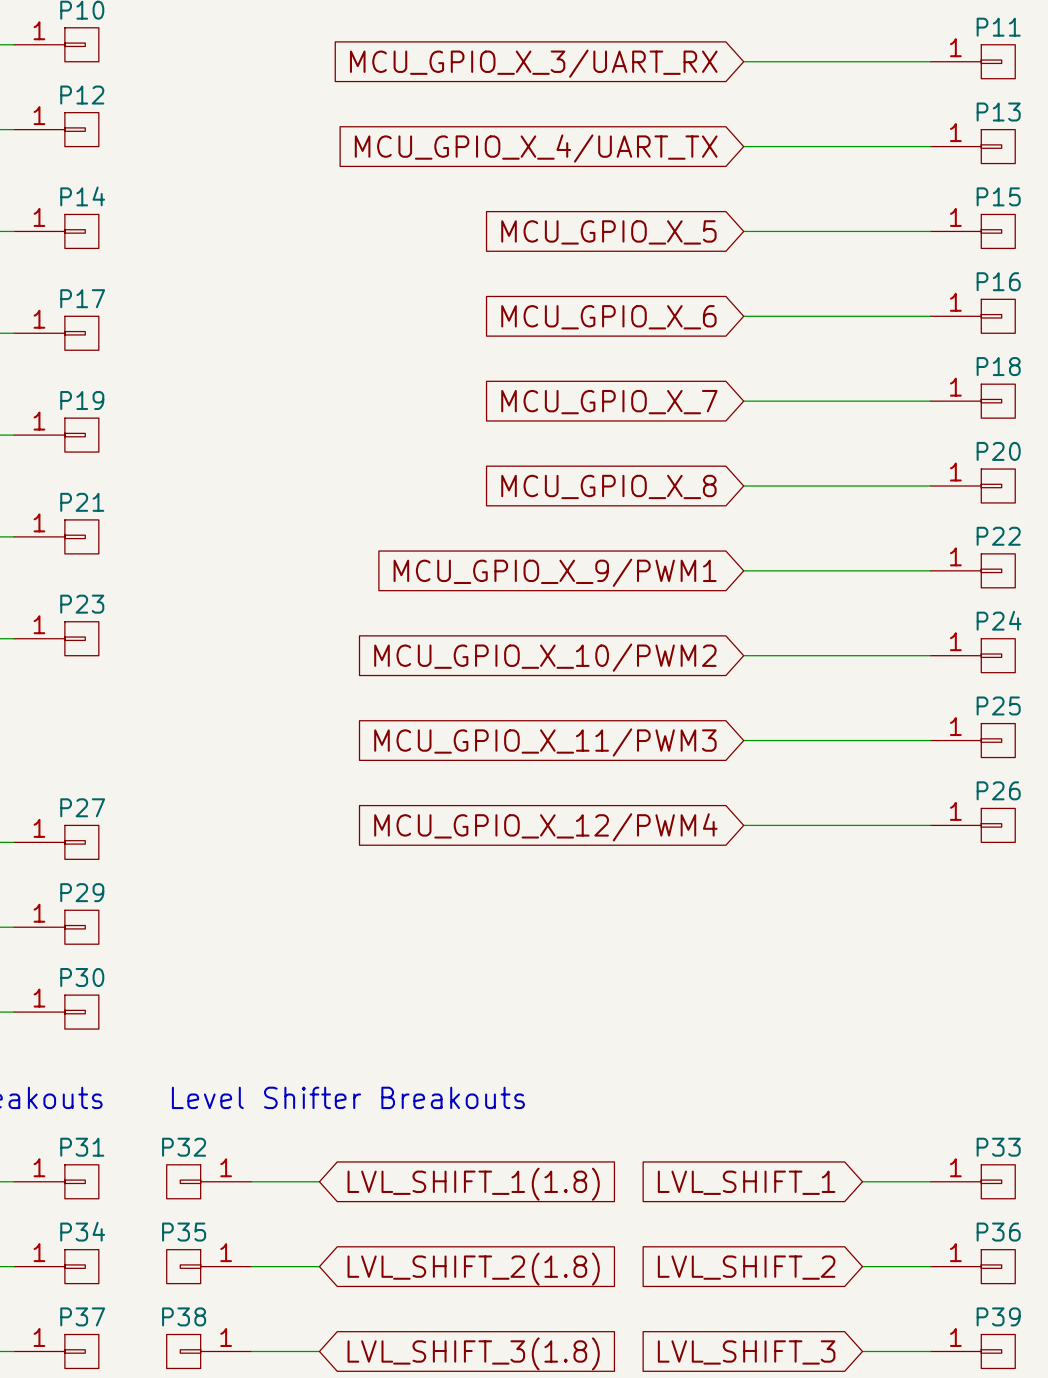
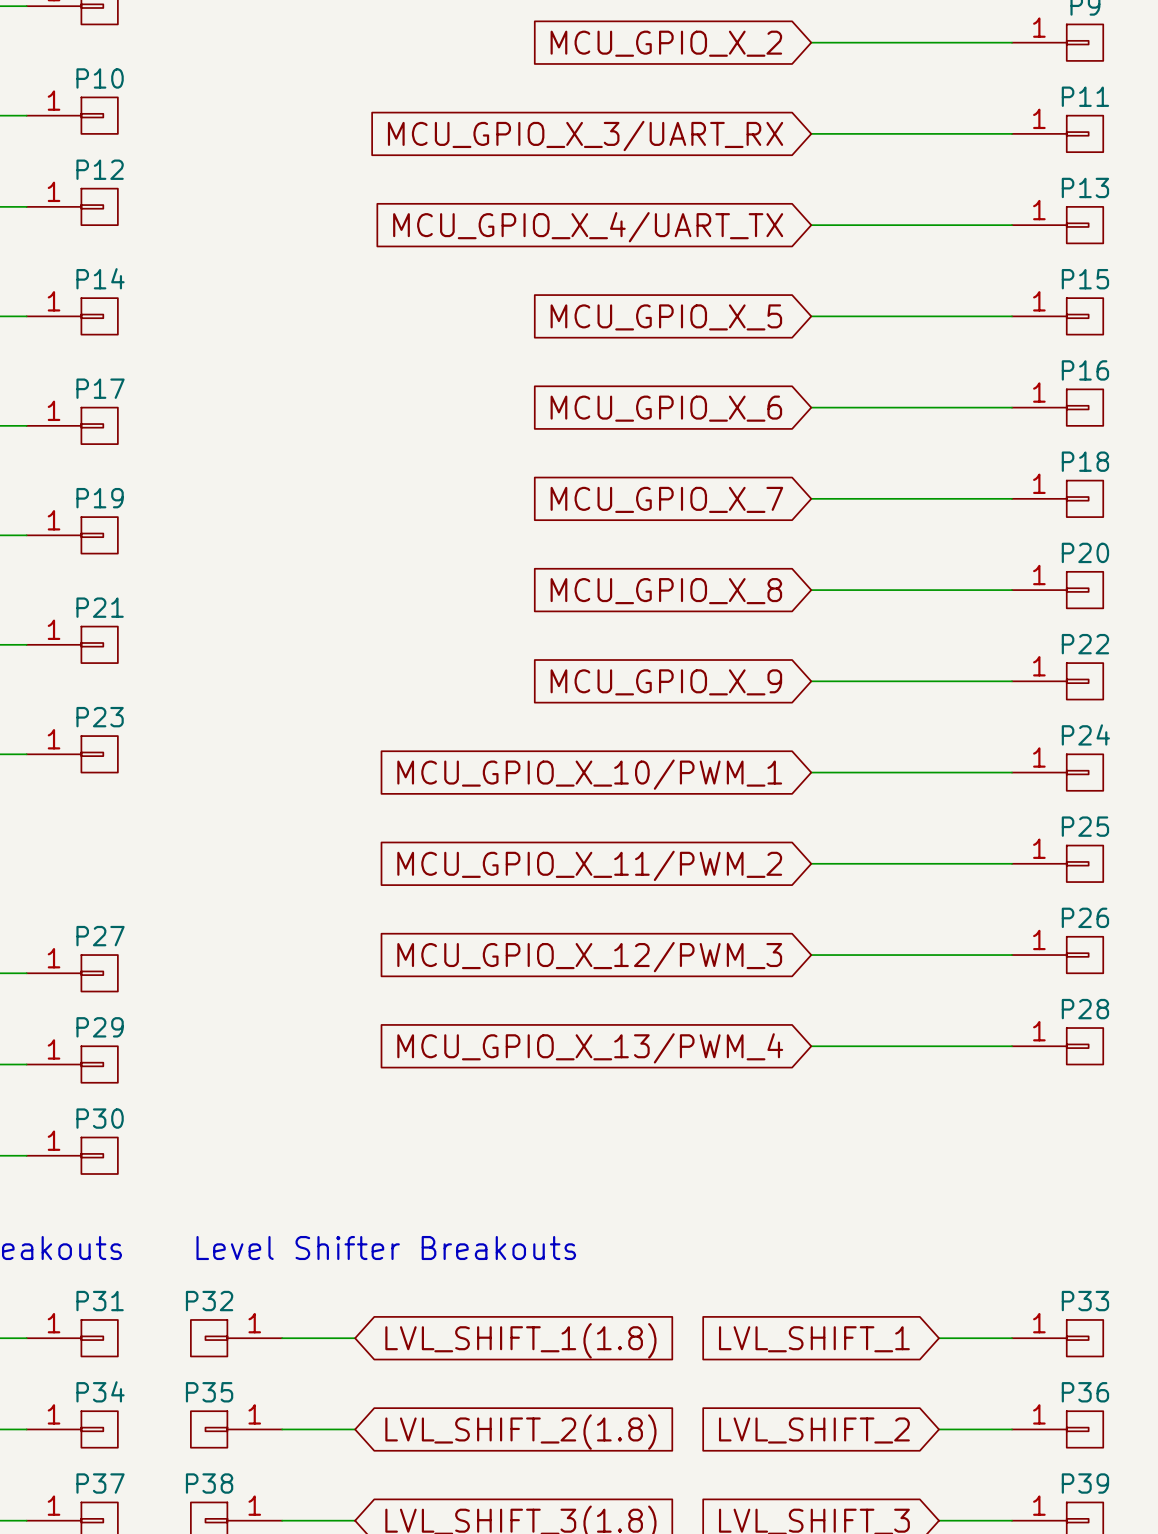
global label: MCU_GPIO_X_9/PWM1 (555, 572) -> MCU_GPIO_X_9 (666, 682)
global label: MCU_GPIO_X_10/PWM2 (545, 657) -> MCU_GPIO_X_10/PWM_1 (589, 774)
global label: MCU_GPIO_X_11/PWM3 (545, 742) -> MCU_GPIO_X_11/PWM_2 (589, 865)
global label: MCU_GPIO_X_12/PWM4 (545, 827) -> MCU_GPIO_X_12/PWM_3 (589, 957)
wire: none -> (811, 1046) (1012, 1046)
P28: none -> (1057, 1046)
global label: none -> MCU_GPIO_X_13/PWM_4 (590, 1048)

